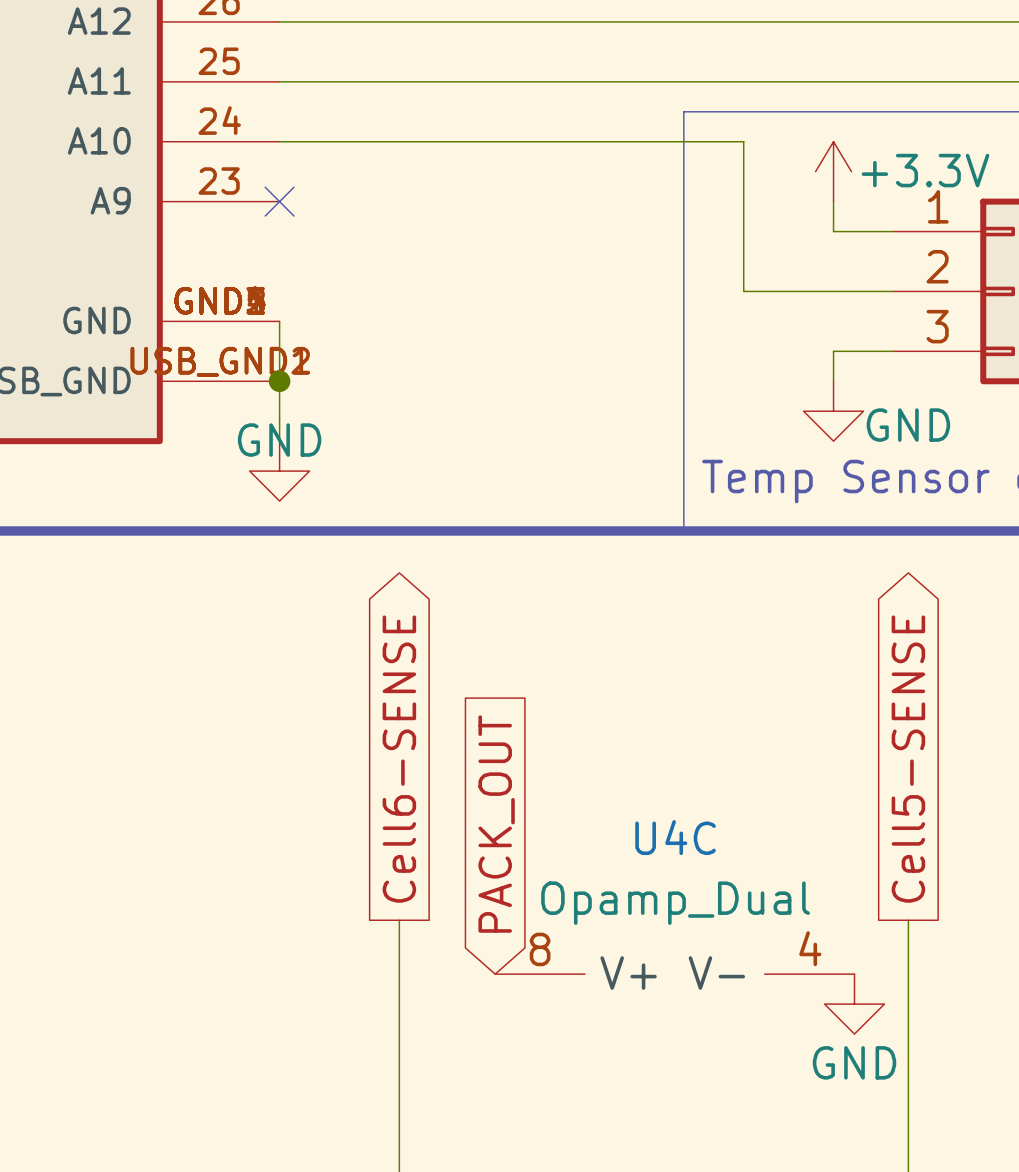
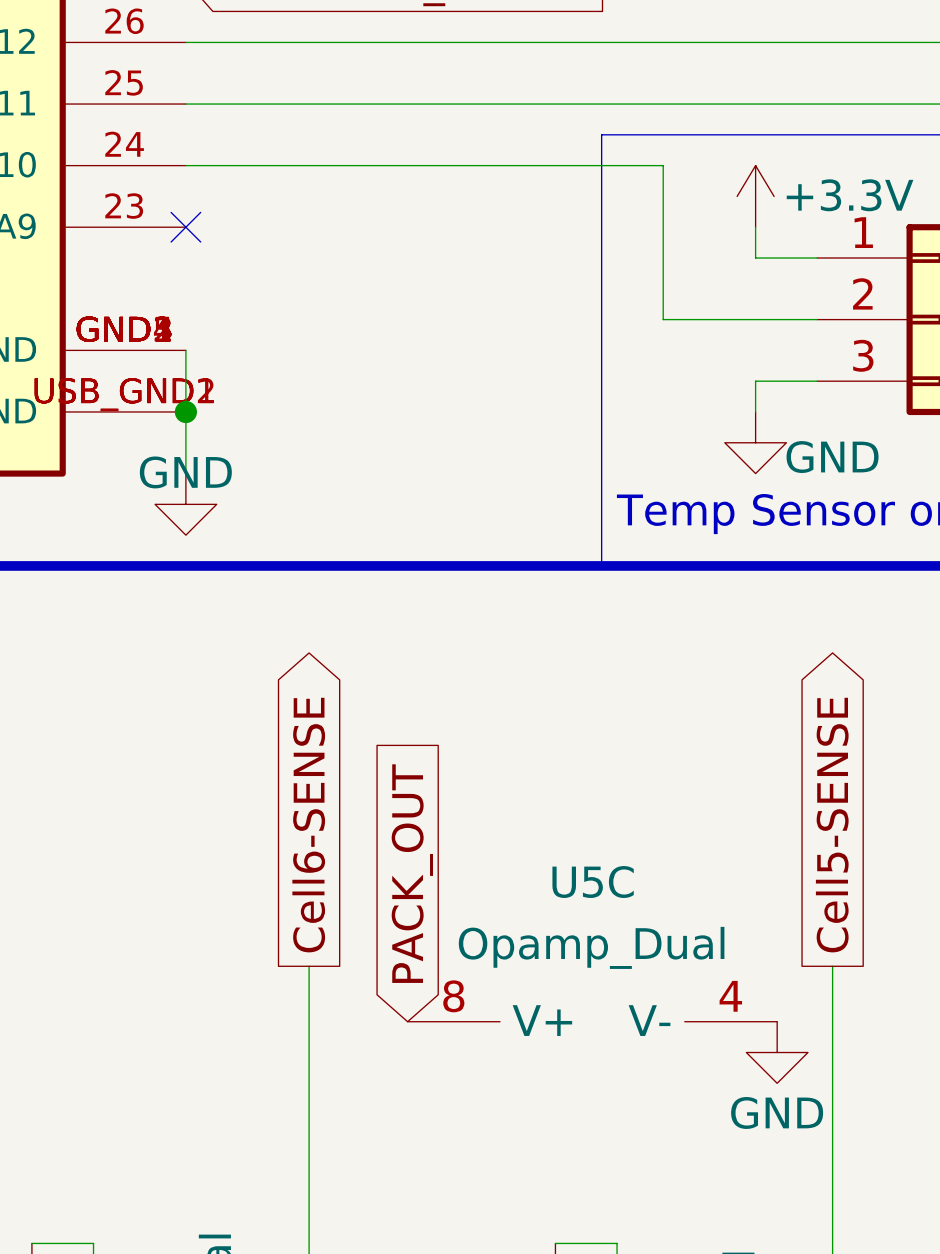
U4C name: U4C (675, 837) -> U5C (593, 882)

